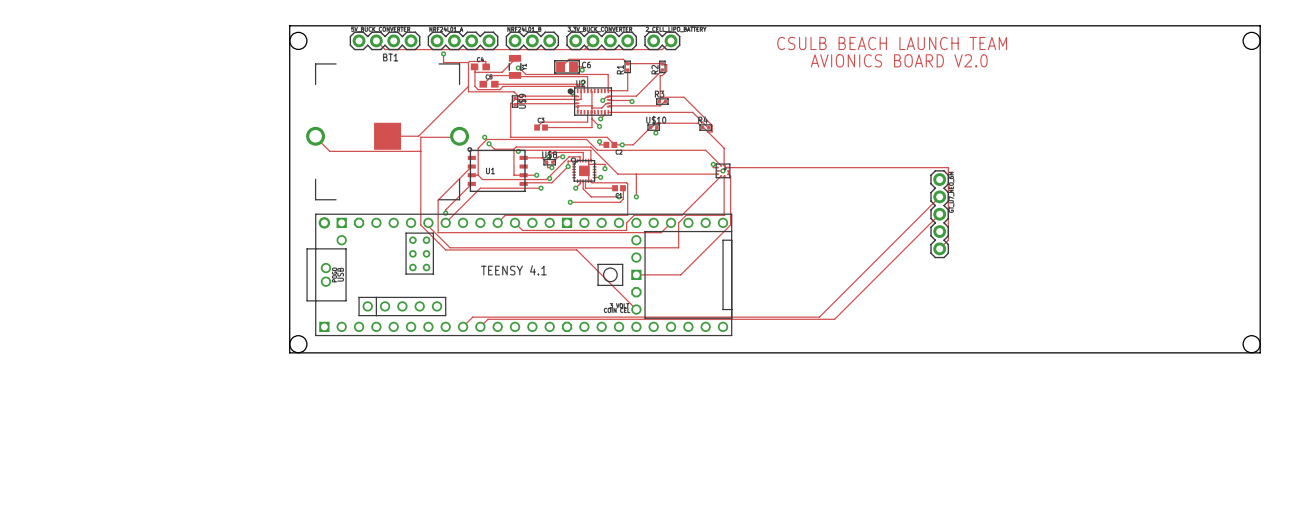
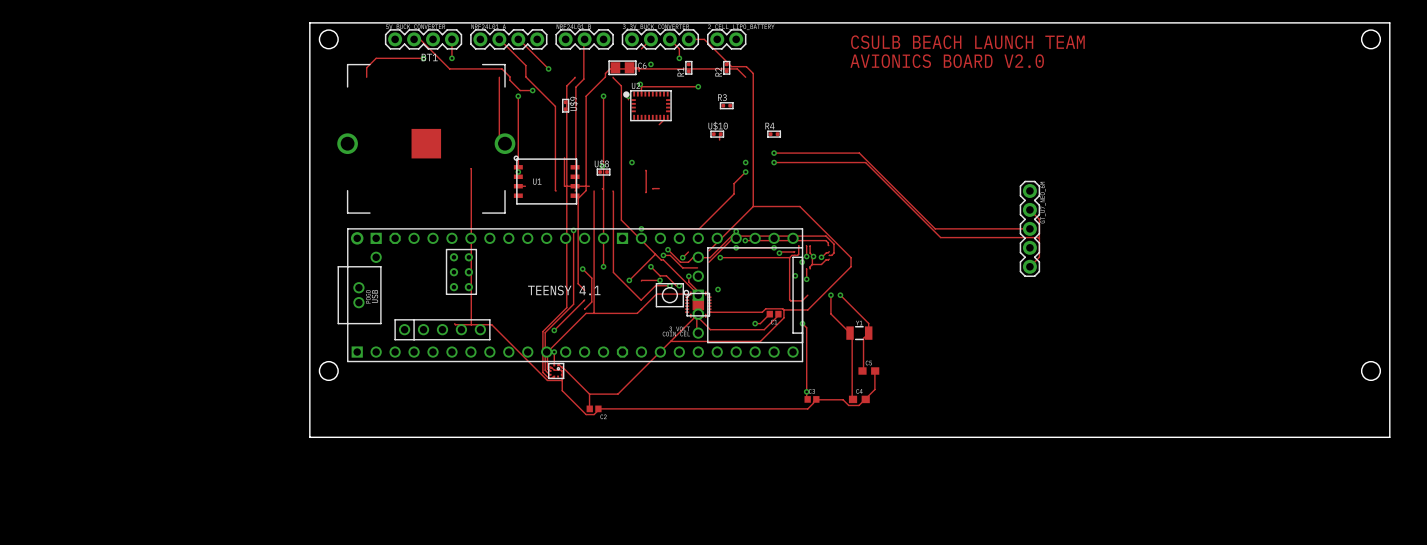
board edge: (289, 25) (289, 352) (1260, 352) (1260, 25) -> (319, 22) (309, 22) (309, 437) (1389, 437) (1389, 22) (1380, 22)
track: (376, 40) (385, 49) (662, 49) (671, 40) -> (414, 39) (420, 39) (449, 68) (501, 68) (520, 90) (532, 90)
track: none -> (451, 39) (451, 58)
track: none -> (499, 39) (525, 65) (525, 76) (555, 106) (556, 190)
track: none -> (518, 39) (548, 68)
track: none -> (584, 39) (583, 79) (575, 87) (575, 190)
track: none -> (669, 39) (679, 48) (679, 58)
track: none -> (688, 39) (704, 39) (731, 66) (746, 66) (753, 73) (753, 206)
track: (443, 53) (443, 62) (468, 62) -> none
via: (443, 53) -> none
track: none -> (423, 58) (376, 58) (366, 67) (366, 77)
via: none -> (423, 58)
via: none -> (451, 58)
track: (515, 58) (502, 72) (474, 72) -> none
via: none -> (679, 58)
text position: AVIONICS BOARD V2.0 (899, 60) -> AVIONICS BOARD V2.0 (947, 61)
track: (468, 62) (468, 91) (513, 91) (518, 96) (577, 96) -> none
track: (468, 62) (485, 61) (486, 66) -> none
track: (474, 66) (474, 86) (478, 89) (499, 89) (503, 86) (584, 86) -> (698, 86) (641, 86) (641, 89)
part position: (480, 66) -> (859, 399)
part rotation: 0° (515, 66) -> 90° clockwise (859, 333)
part position: (515, 66) -> (859, 333)
track: (560, 66) (569, 59) (623, 59) (627, 63) (666, 64) (666, 71) (660, 75) (659, 101) -> none
track: (518, 67) (525, 74) (608, 74) (608, 90) -> none
via position: (518, 67) -> (548, 68)
via position: (582, 70) -> (650, 64)
track: (627, 70) (627, 90) (608, 90) -> none
track: (662, 70) (636, 96) (609, 96) (602, 100) -> none
track: none -> (499, 77) (499, 143)
track: none -> (575, 77) (566, 85) (566, 307) (542, 331) (542, 372) (548, 378) (554, 376)
track: none -> (613, 77) (621, 85) (621, 220) (694, 290) (693, 293)
track: none -> (745, 77) (737, 68) (610, 68) (605, 73) (605, 76) (586, 96) (586, 190) (578, 198) (578, 283) (584, 290)
track: (583, 82) (583, 84) (494, 84) -> none
track: (483, 84) (492, 75) (587, 76) (587, 90) -> none
part position: (489, 84) -> (868, 370)
track: (468, 86) (418, 136) (387, 136) -> none
via: none -> (532, 90)
track: (581, 90) (581, 99) (515, 99) (510, 103) (510, 137) (607, 137) (614, 144) -> none
track: (591, 90) (591, 127) (544, 127) -> none
track: none -> (518, 96) (518, 172)
via: none -> (518, 96)
track: none -> (603, 96) (603, 266)
via: none -> (603, 96)
track: (660, 97) (684, 97) (712, 125) (712, 131) (707, 131) -> none
track: (608, 99) (632, 101) -> none
via: (602, 100) -> none
via position: (632, 101) -> (698, 86)
track: (665, 101) (660, 105) (608, 106) -> none
track: (577, 103) (515, 104) -> none
track: (608, 103) (601, 108) (591, 108) -> none
track: (591, 105) (577, 105) (577, 112) -> none
track: (587, 112) (587, 122) (542, 122) (537, 127) -> none
track: (608, 112) (692, 112) (708, 127) -> none
track: (591, 118) (599, 126) -> none
via: (600, 118) -> none
via: (599, 126) -> none
part position: (541, 127) -> (812, 399)
via: (655, 132) -> none
track: (315, 136) (329, 151) (420, 151) -> none
track: (459, 136) (420, 137) (420, 225) (445, 249) (576, 249) (635, 308) -> (696, 315) (696, 331)
via: (484, 137) -> none
track: (486, 139) (586, 139) (597, 150) (705, 150) (721, 165) -> none
track: (486, 139) (478, 148) (478, 175) (482, 179) (546, 179) (569, 156) (580, 156) (580, 160) -> none
track: (599, 141) (599, 144) (606, 144) -> none
via: (599, 141) -> none
track: (489, 143) (494, 149) (513, 149) (516, 147) (590, 147) (617, 174) (717, 174) -> none
via: (489, 143) -> none
part position: (610, 144) -> (594, 408)
track: (614, 144) (633, 144) (655, 123) (698, 123) (724, 148) (724, 165) (726, 167) (948, 167) (948, 205) -> (1029, 209) (1039, 219)
via: (622, 144) -> none
via: none -> (774, 153)
track: (518, 151) (590, 150) (591, 160) -> none
via: (518, 151) -> none
via: none -> (631, 162)
via: none -> (745, 162)
track: none -> (774, 162) (865, 162) (940, 237) (1039, 238)
via: none -> (774, 162)
track: (548, 156) (552, 152) (583, 152) (583, 160) -> none
track: (562, 156) (558, 156) (552, 162) -> none
via: (562, 156) -> none
track: (523, 157) (542, 157) (547, 162) (547, 167) (551, 167) -> none
track: none -> (470, 168) (471, 324)
track: (577, 160) (568, 161) (568, 166) (551, 182) (523, 183) -> none
via: none -> (518, 172)
track: none -> (745, 172) (734, 183) (734, 194) (699, 228) (641, 228)
via: none -> (745, 172)
track: (588, 164) (604, 164) (604, 168) -> none
track: (713, 164) (713, 167) (717, 167) -> none
via: (713, 164) -> none
track: (471, 166) (438, 200) (438, 232) (661, 232) (671, 222) -> none
via: (568, 166) -> none
via: (551, 167) -> none
via: (604, 168) -> none
part position: (583, 170) -> (697, 303)
track: (717, 170) (723, 170) -> none
part: (723, 170) -> none
via: (723, 170) -> none
track: (728, 170) (728, 174) -> none
track: (636, 174) (636, 196) -> none
track: (728, 174) (730, 176) (730, 225) (680, 274) (636, 274) -> none
via: (536, 175) -> none
track: (721, 176) (681, 215) (634, 215) (626, 222) (626, 230) (522, 230) (515, 222) -> none
track: (724, 176) (724, 215) (686, 215) (678, 222) (678, 247) (450, 247) (428, 226) (428, 222) -> none
via: (600, 177) -> none
via: (549, 178) -> none
track: none -> (594, 190) (594, 313)
track: none -> (613, 190) (613, 272) (641, 299) (655, 285) (669, 285)
track: (580, 181) (575, 188) -> none
track: (583, 181) (583, 188) (591, 196) (619, 196) -> none
track: (585, 181) (585, 188) (615, 188) -> none
track: (591, 181) (591, 182) (626, 182) (627, 215) (505, 215) (497, 222) -> none
track: (471, 183) (445, 209) (445, 213) -> none
track: (541, 188) (480, 188) (445, 222) -> none
via: (541, 188) -> none
via: (575, 188) -> none
part position: (619, 188) -> (774, 314)
track: (622, 188) (623, 199) (620, 202) (570, 202) -> none
track: none -> (753, 206) (708, 250)
track: none -> (753, 206) (799, 206) (851, 257) (851, 266) (807, 309) (783, 309)
via: (619, 196) -> none
via: (636, 196) -> none
track: (939, 196) (819, 317) (472, 317) (463, 326) -> none
via: (570, 202) -> none
via: (445, 213) -> none
via: none -> (641, 228)
track: (939, 214) (834, 319) (487, 319) (480, 326) -> (1029, 228) (935, 228) (859, 153) (774, 153)
track: none -> (573, 230) (573, 304) (545, 332) (545, 370) (550, 374)
via: none -> (573, 230)
track: none -> (736, 231) (710, 257) (693, 257) (688, 262) (680, 262) (667, 249)
via: none -> (736, 231)
track: none -> (745, 240) (826, 240) (828, 245)
via: none -> (745, 240)
track: none -> (798, 245) (798, 254) (789, 257)
track: none -> (806, 245) (806, 256)
track: none -> (810, 245) (812, 264)
track: none -> (736, 247) (774, 247)
via: none -> (736, 247)
via: none -> (774, 247)
via: none -> (667, 249)
track: none -> (688, 251) (682, 257)
track: none -> (794, 251) (779, 253)
track: none -> (829, 251) (821, 257)
via: none -> (779, 253)
track: none -> (655, 254) (629, 280)
track: none -> (663, 255) (670, 255) (682, 267) (697, 267)
via: none -> (663, 255)
track: none -> (829, 255) (833, 253) (833, 244) (826, 236) (735, 236) (708, 262)
via: none -> (806, 256)
via: none -> (813, 256)
via: none -> (682, 257)
track: none -> (720, 257) (789, 257)
via: none -> (720, 257)
track: none -> (789, 257) (789, 299) (802, 300) (807, 295)
via: none -> (821, 257)
track: none -> (829, 259) (821, 264) (812, 264)
via: none -> (802, 262)
track: none -> (812, 264) (810, 268)
via: none -> (603, 266)
track: none -> (650, 266) (660, 275) (666, 275) (676, 285) (679, 285)
via: none -> (650, 266)
track: none -> (582, 269) (591, 278) (591, 302) (584, 309)
via: none -> (582, 269)
track: none -> (806, 268) (806, 279)
track: none -> (688, 276) (688, 282) (696, 289) (696, 293)
via: none -> (688, 276)
via: none -> (795, 275)
via: none -> (806, 279)
via: none -> (629, 280)
track: none -> (660, 280) (641, 280)
via: none -> (660, 280)
via: none -> (669, 285)
via: none -> (679, 285)
via: none -> (718, 289)
track: none -> (690, 293) (656, 294) (637, 313) (586, 313) (547, 352) (547, 369) (550, 370)
track: none -> (830, 295) (830, 313) (852, 334) (853, 399)
via: none -> (830, 295)
track: none -> (840, 295) (868, 323) (868, 333) (863, 338) (862, 370)
via: none -> (840, 295)
track: none -> (584, 299) (554, 330)
track: none -> (783, 309) (765, 308) (762, 312) (709, 312)
track: none -> (783, 309) (783, 317) (760, 341) (670, 341)
track: none -> (769, 314) (760, 323) (755, 323)
track: none -> (778, 314) (764, 329) (710, 329) (699, 319) (699, 315)
track: none -> (693, 315) (694, 317) (617, 394) (589, 394)
track: none -> (454, 323) (491, 324) (547, 380) (562, 380)
via: none -> (755, 323)
track: none -> (802, 323) (806, 327) (807, 399)
via: none -> (802, 323)
via: none -> (554, 330)
track: none -> (554, 352) (554, 365)
via: none -> (554, 352)
track: none -> (558, 365) (563, 367) (589, 394)
track: none -> (550, 367) (554, 370) (562, 371) (562, 390) (586, 414) (594, 414) (597, 408) (807, 408) (816, 399) (843, 399) (848, 405) (858, 405) (874, 389) (875, 370)
part: none -> (556, 370)
via: none -> (806, 391)
track: none -> (589, 394) (589, 408)

